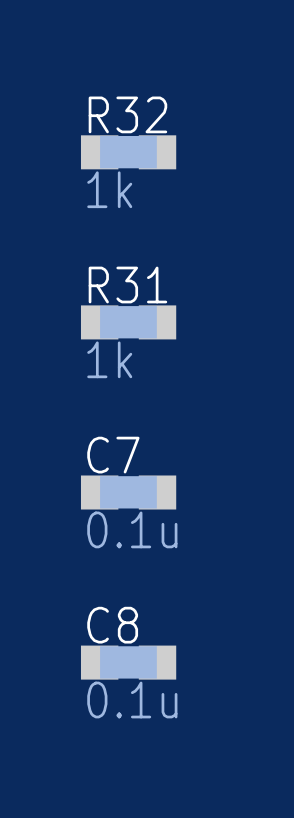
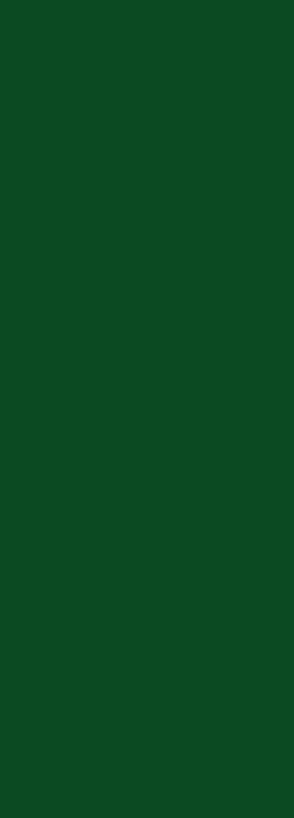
R32: 1k (128, 152) -> none
R31: 1k (128, 322) -> none
C7: 0.1u (128, 492) -> none
C8: 0.1u (128, 662) -> none

